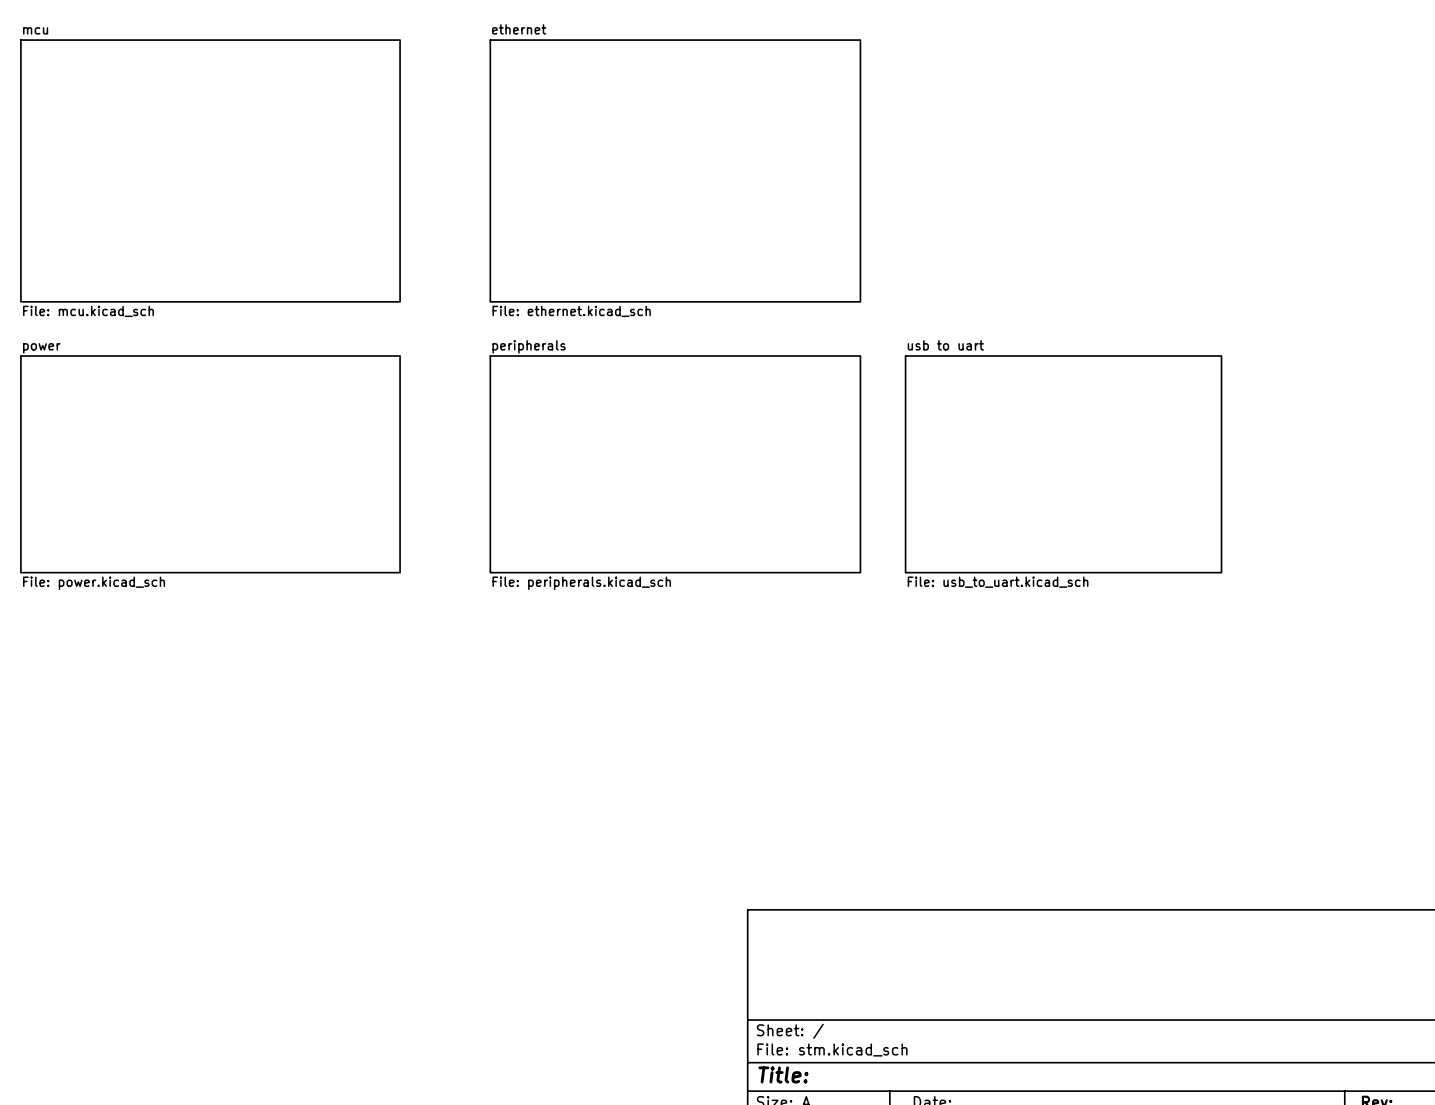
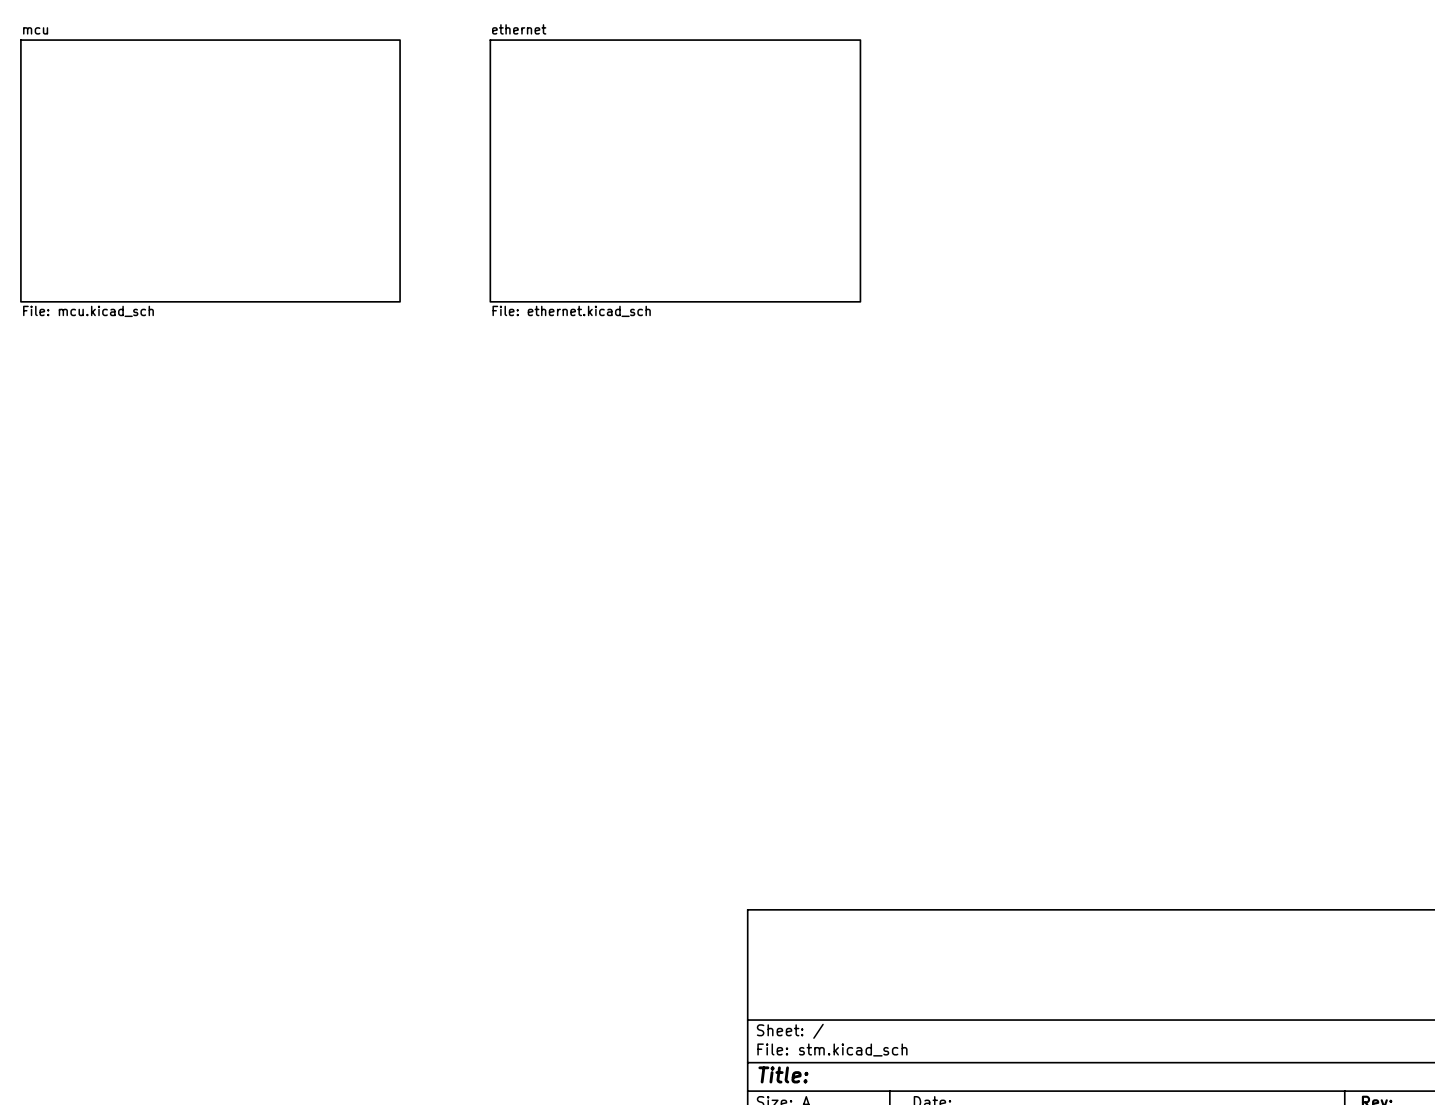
sheet power: File: power.kicad_sch (210, 464) -> none
sheet peripherals: File: peripherals.kicad_sch (675, 464) -> none
sheet usb to uart: File: usb_to_uart.kicad_sch (1063, 464) -> none

